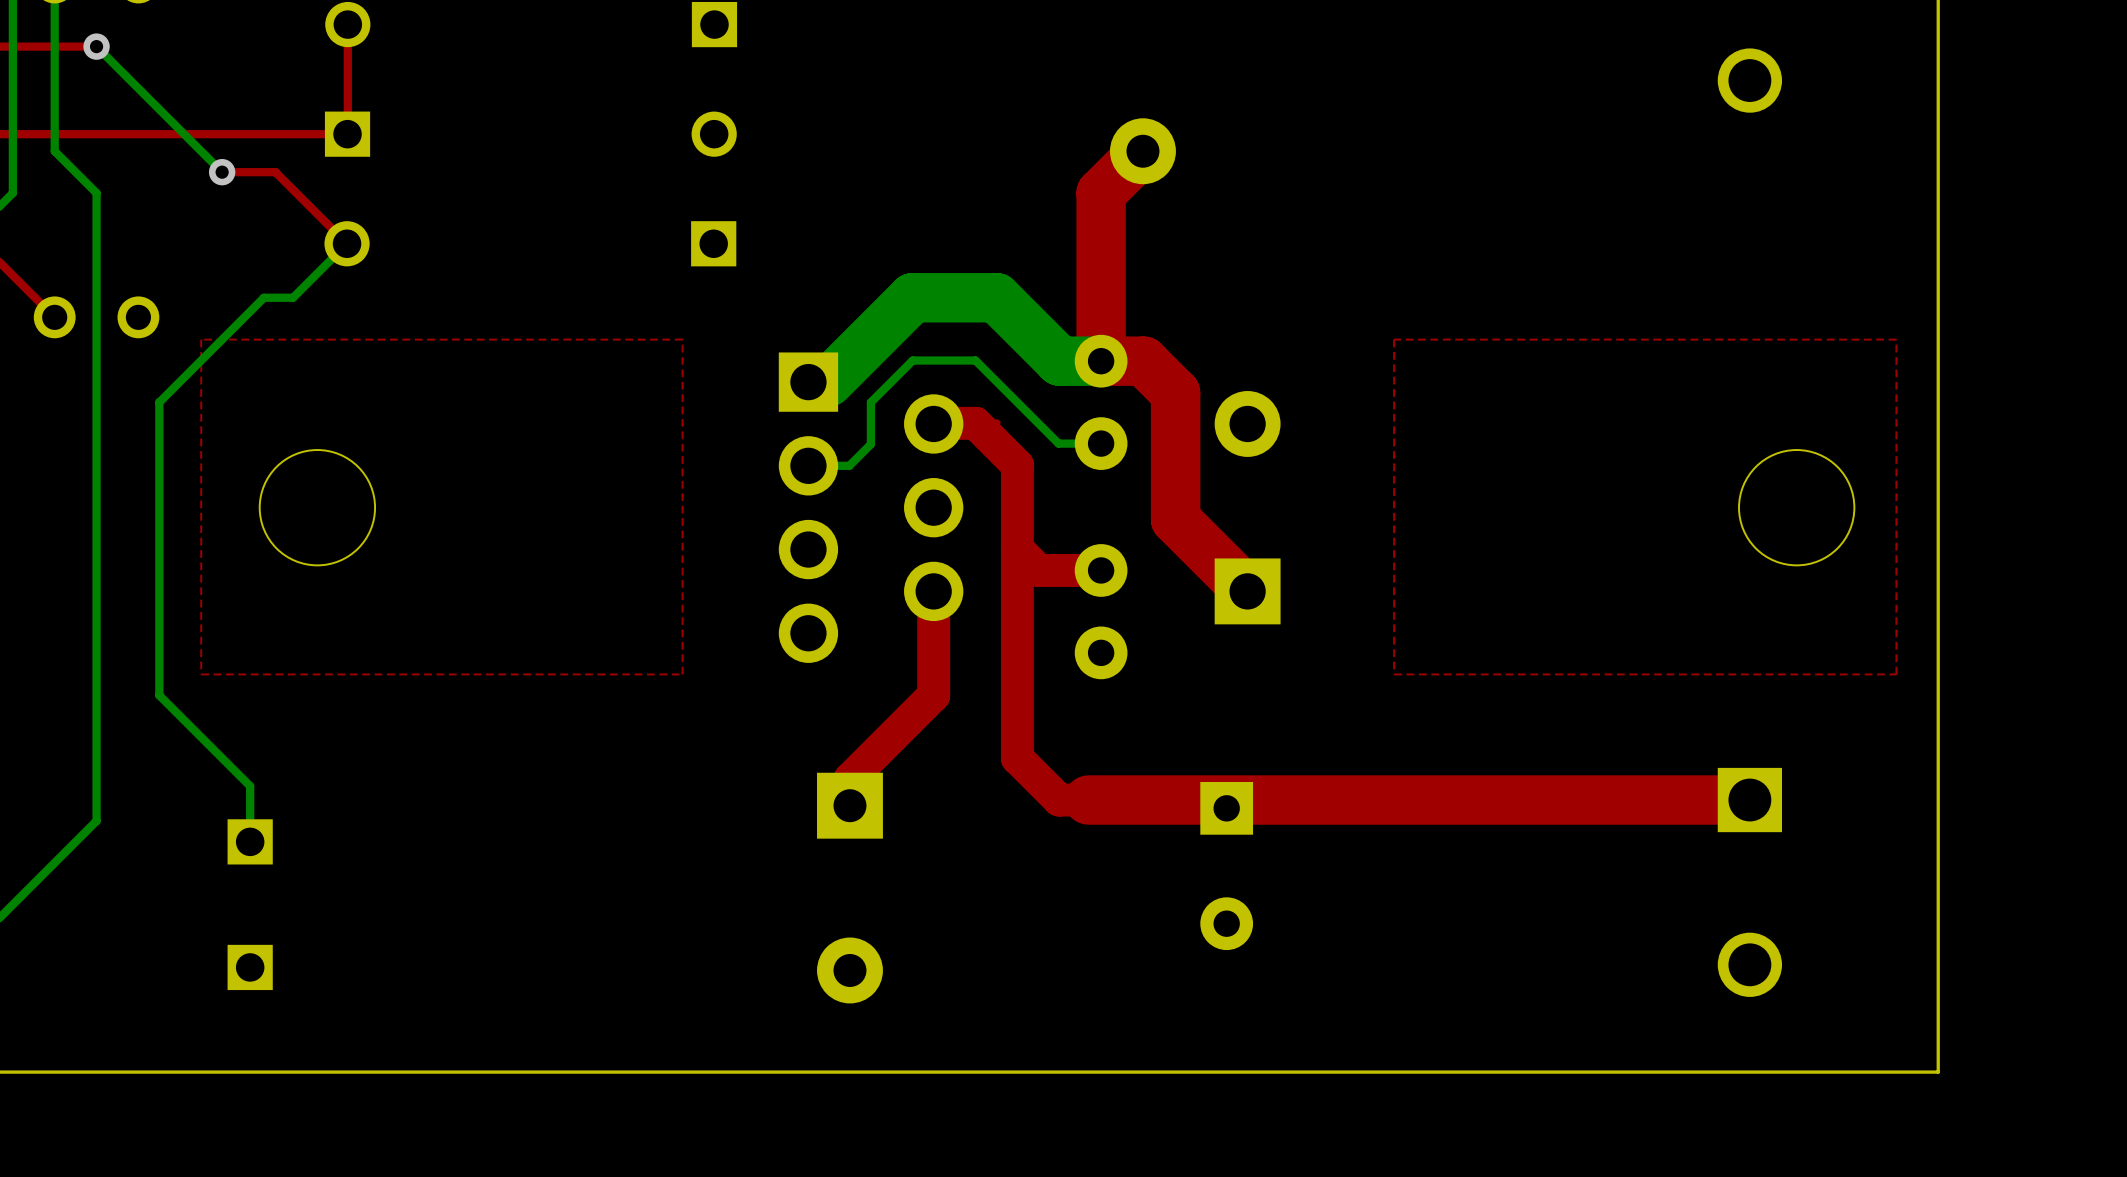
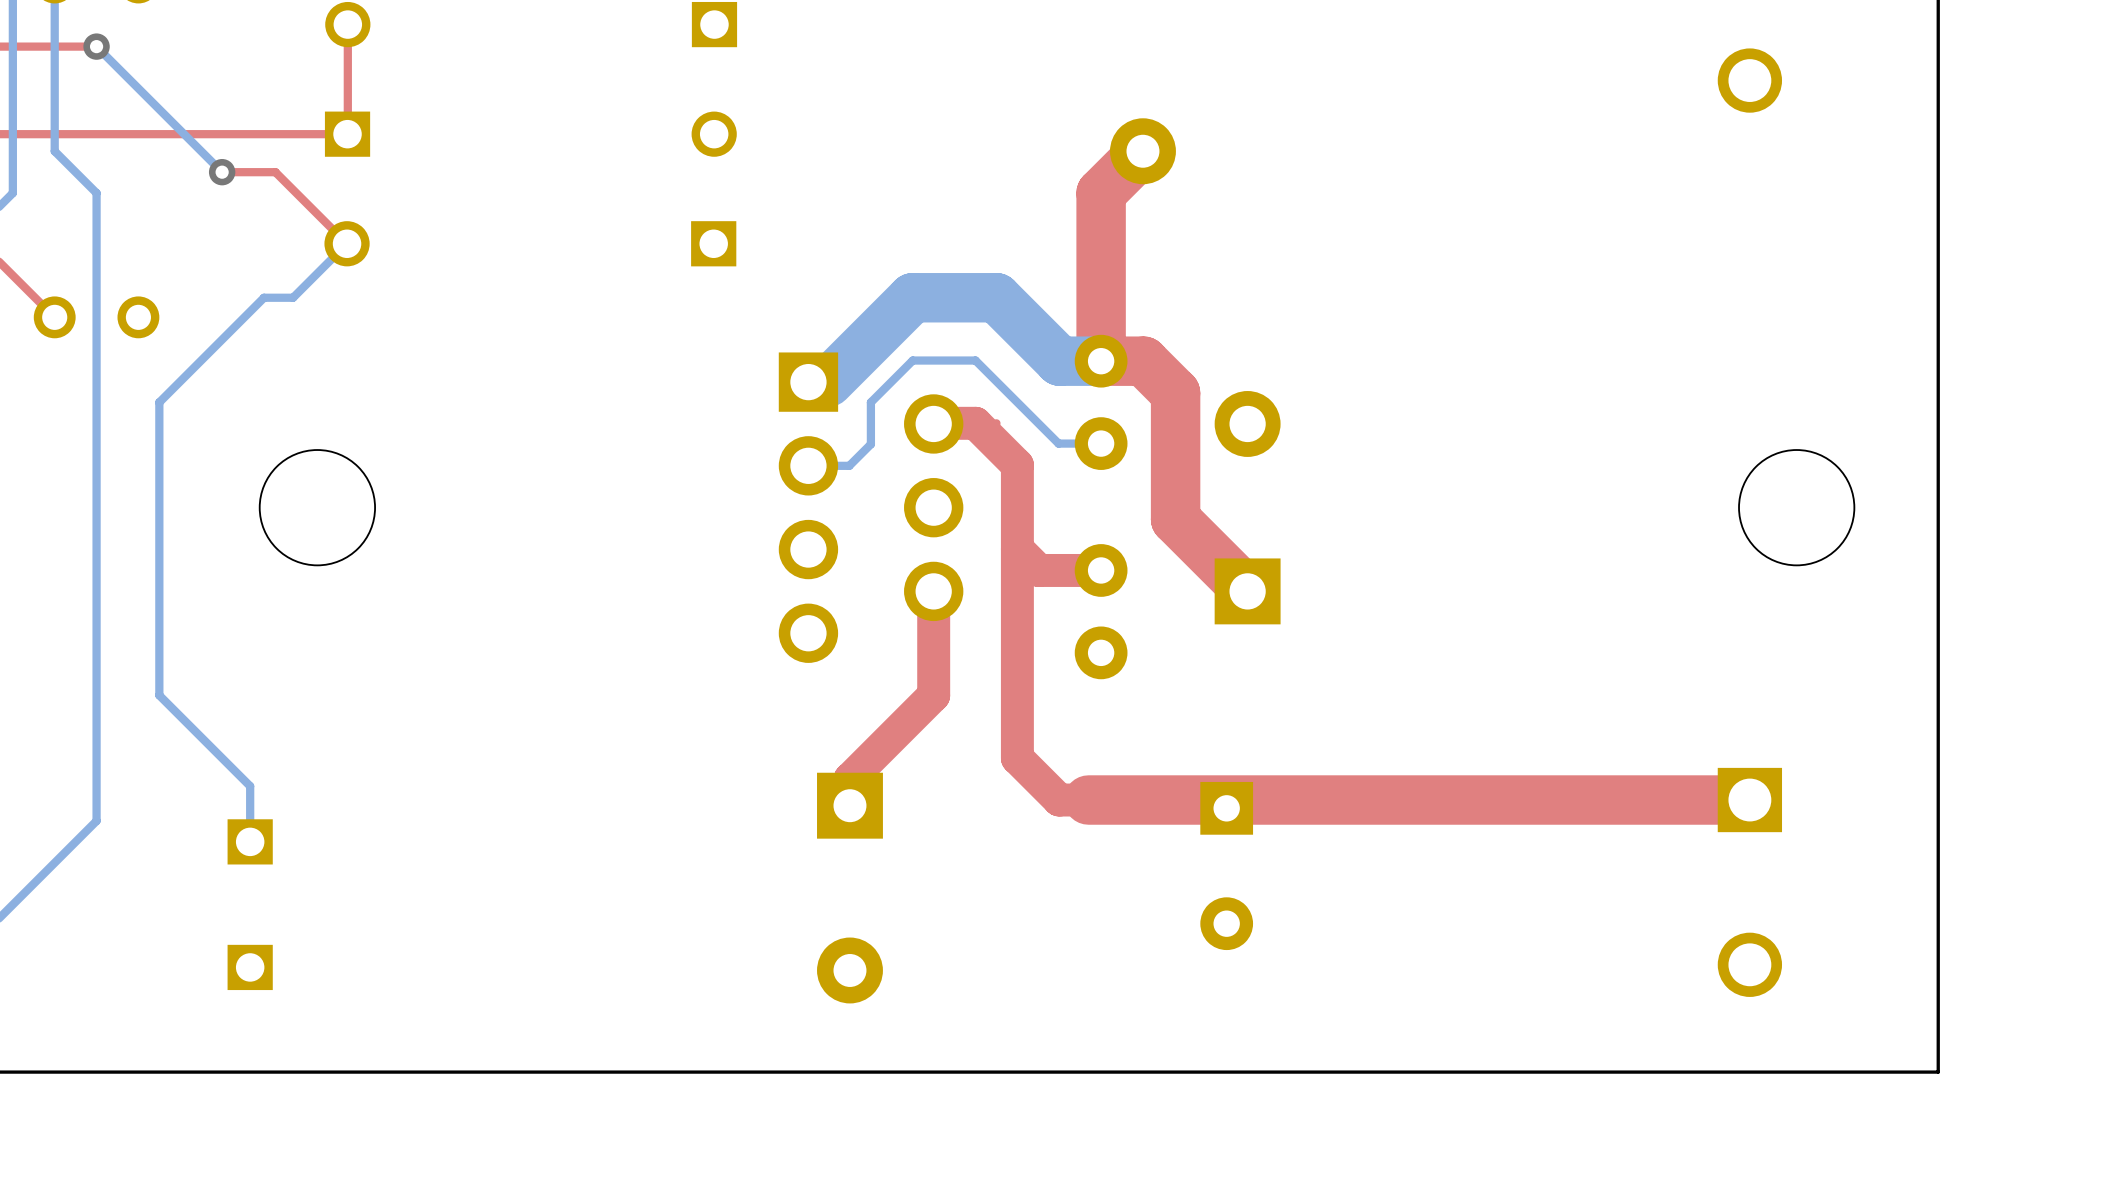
top zone outline: (682, 339) (682, 674) (201, 674) (201, 339) (682, 339) -> none
top zone outline: (1896, 339) (1394, 339) (1394, 674) (1896, 674) (1896, 339) -> none

